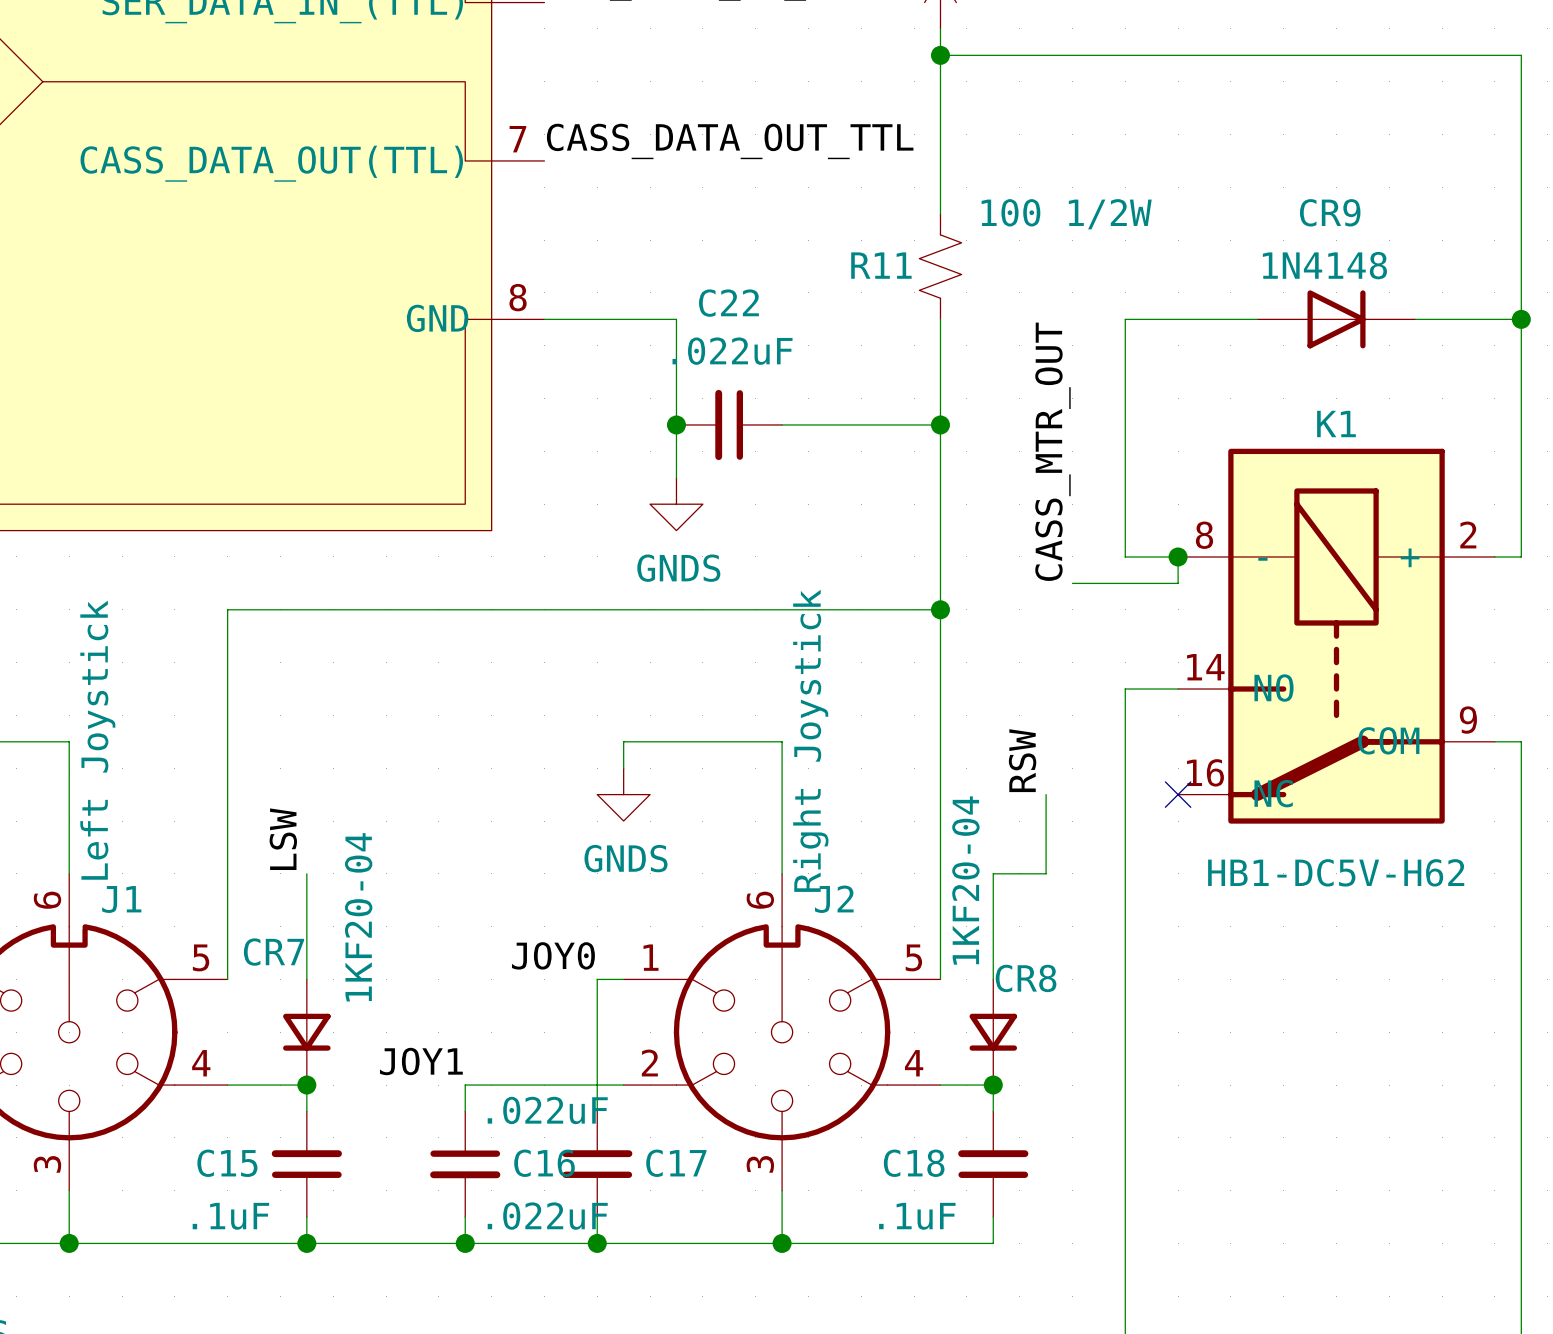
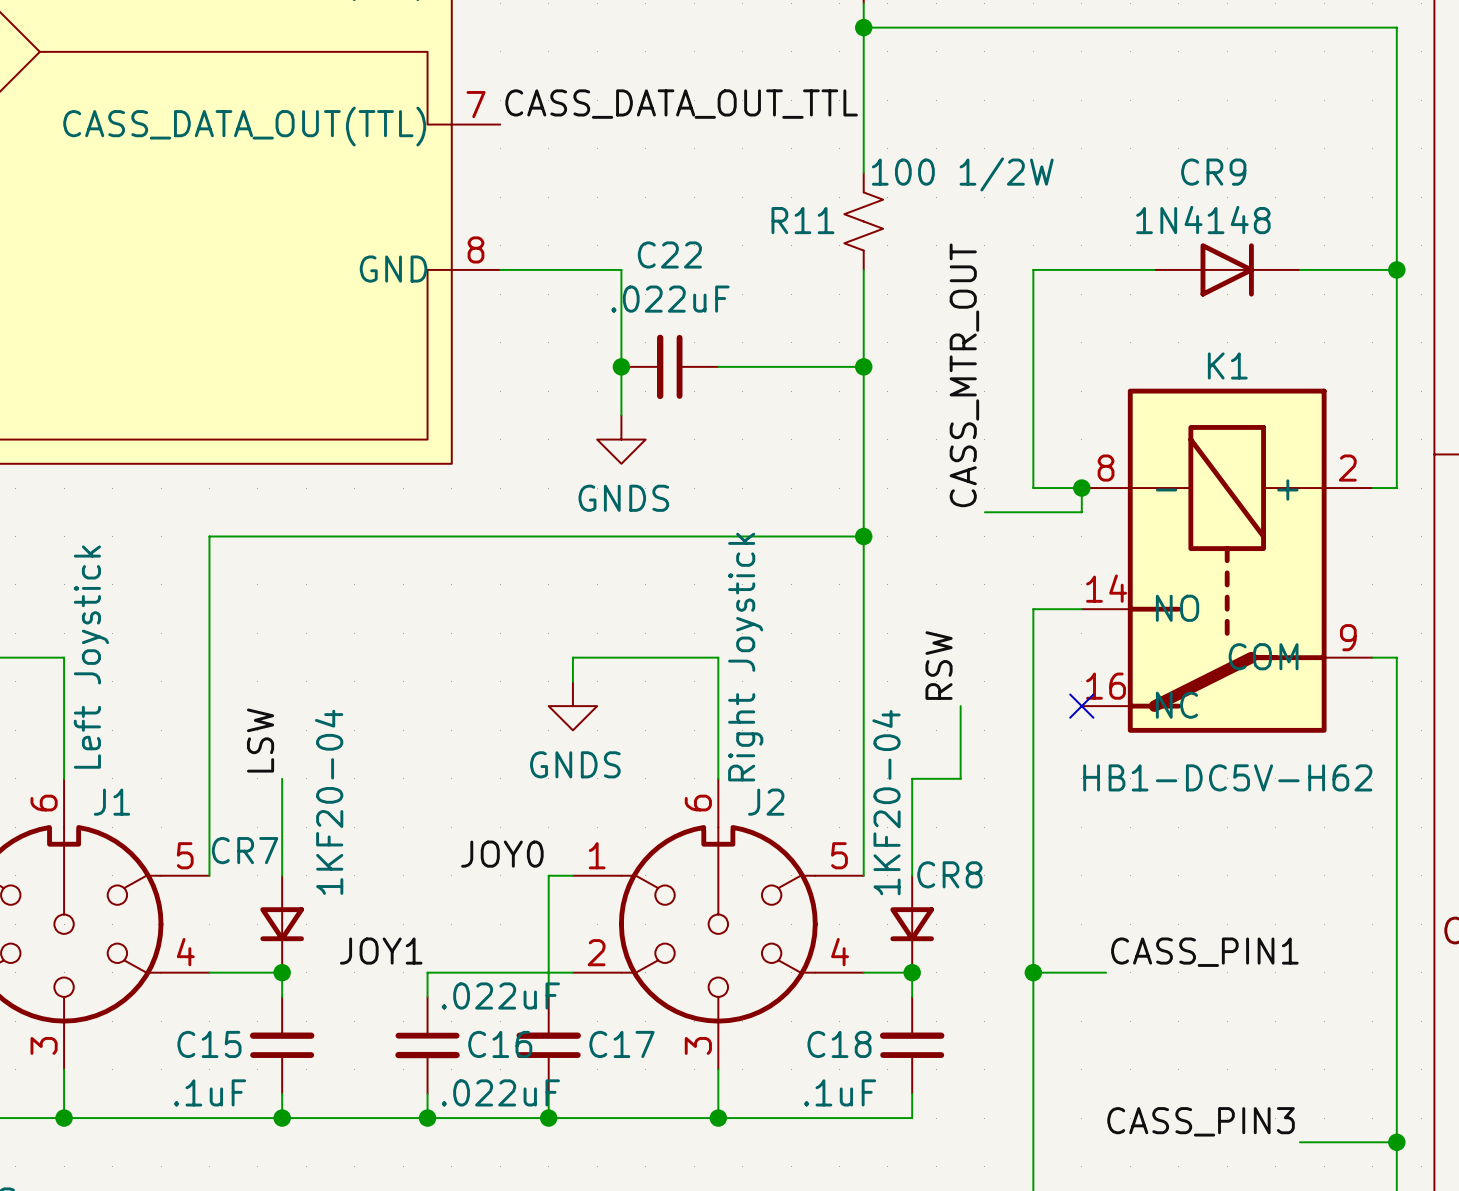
label: none -> CASS_PIN1 (1204, 952)
wire: none -> (1033, 972) (1106, 972)
junction: none -> (1033, 972)
label: none -> CASS_PIN3 (1201, 1121)
wire: none -> (1299, 1142) (1396, 1142)
junction: none -> (1396, 1142)

